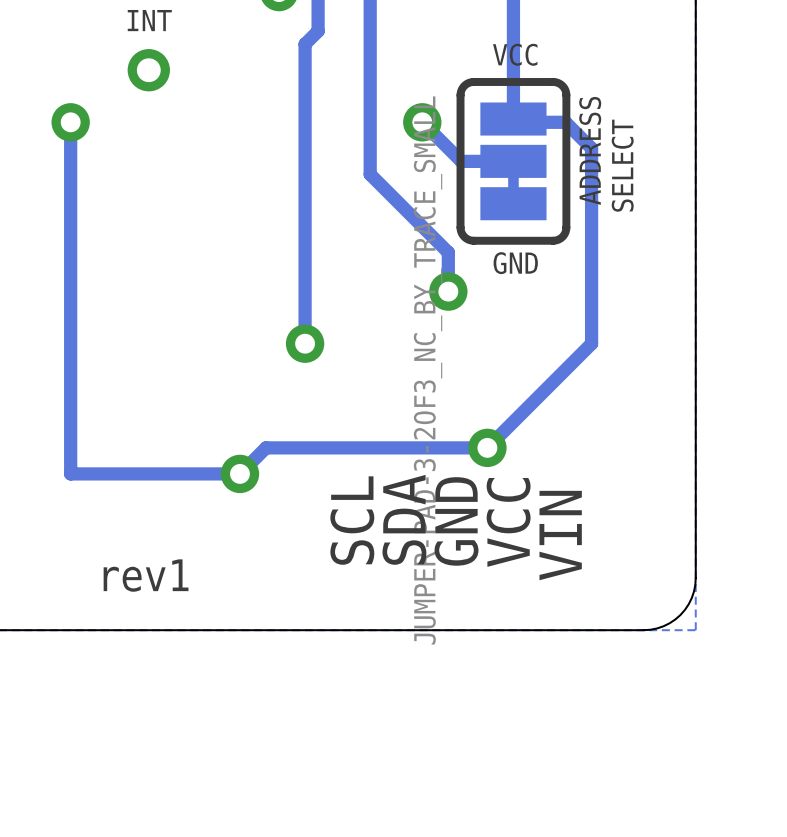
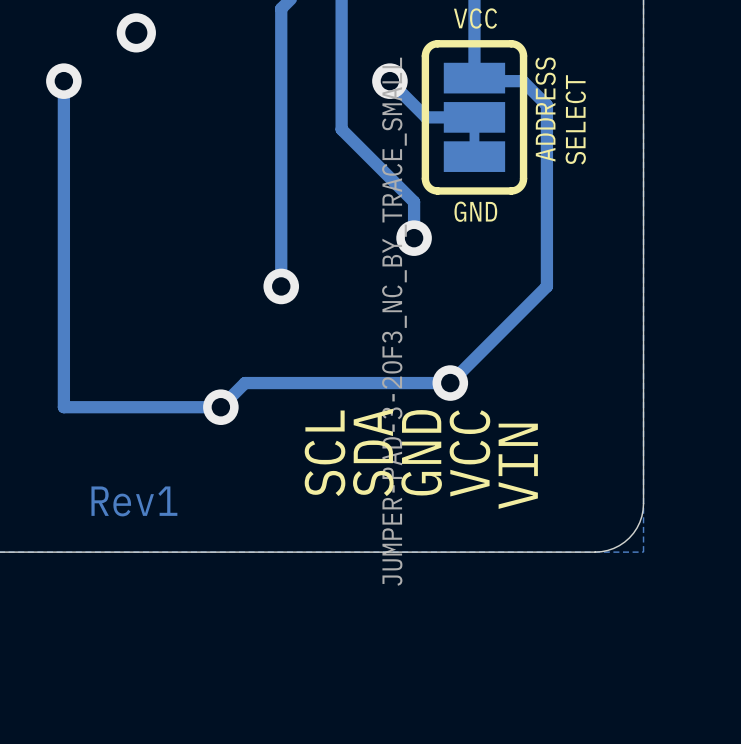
text: rev1 (146, 575) -> Rev1 (134, 501)

